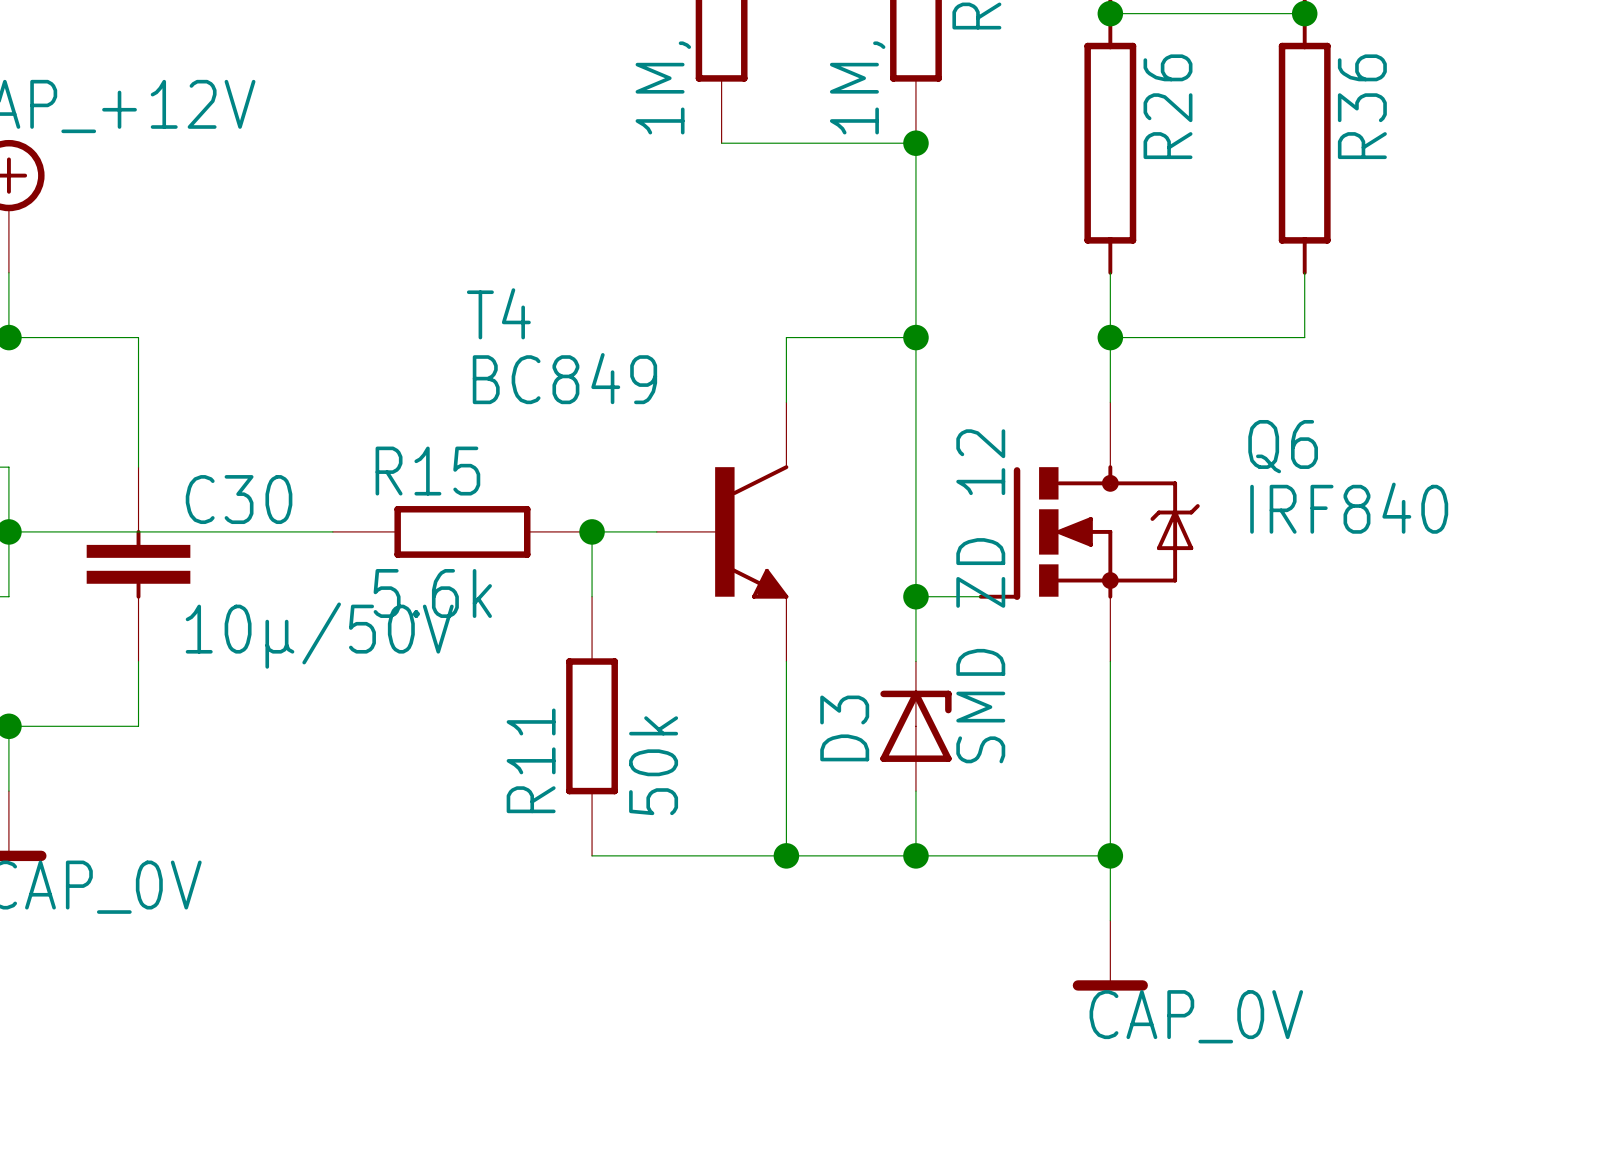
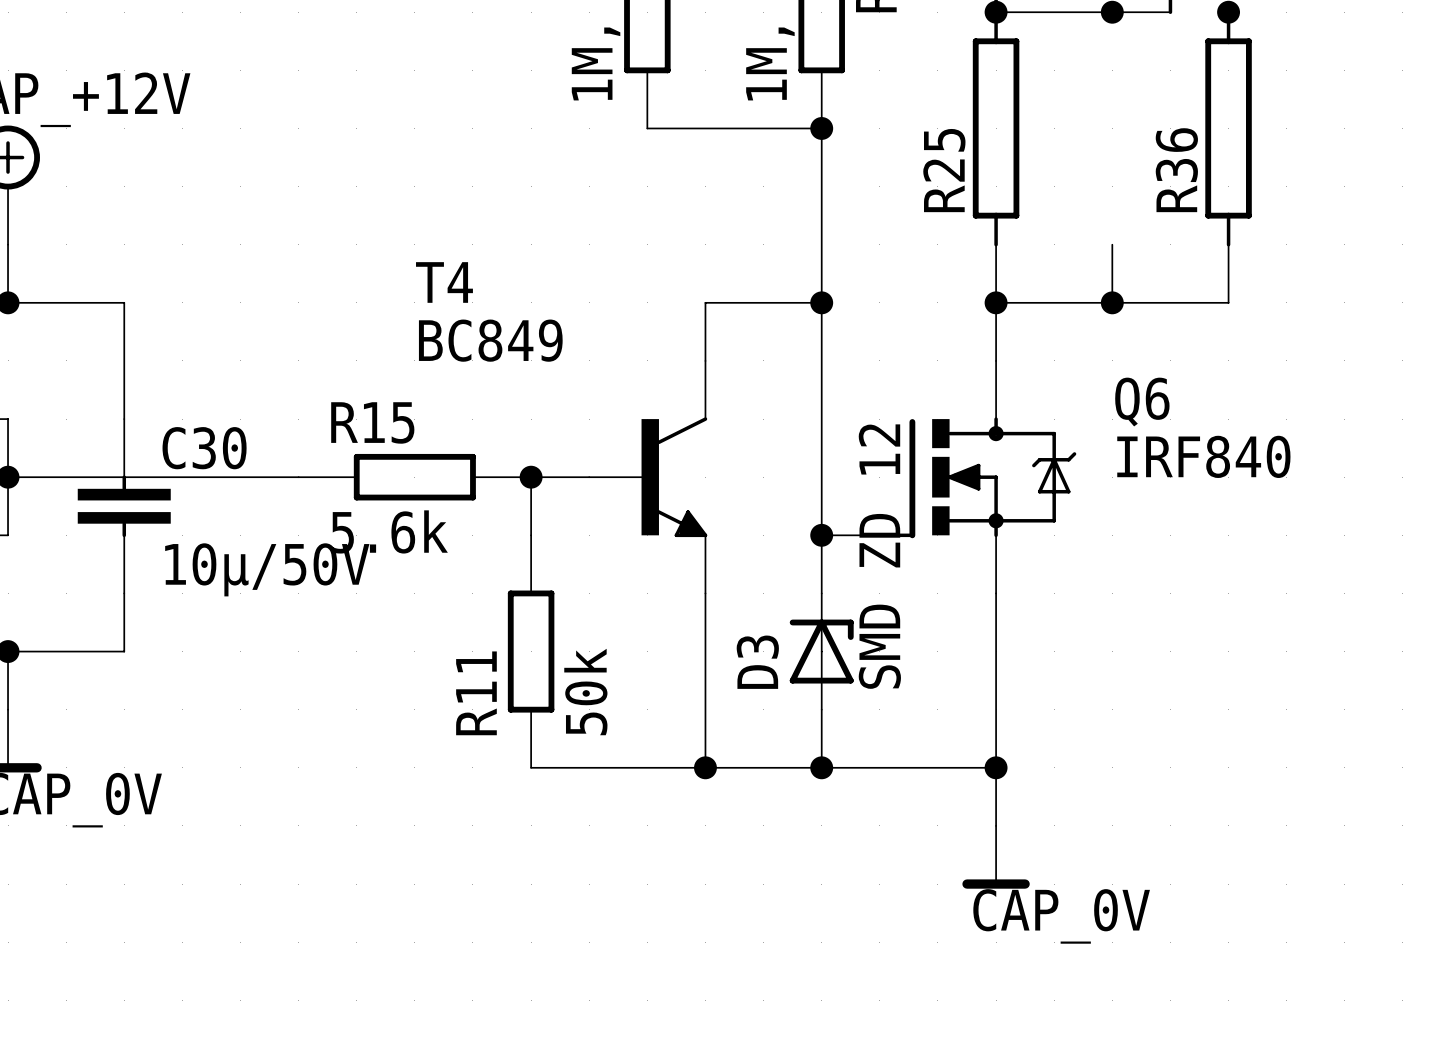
junction: none -> (1112, 12)
junction: (1304, 13) -> none
junction: none -> (1228, 12)
R26 name: R26 (1168, 106) -> R25 (944, 170)
R36 name position: R36 (1362, 106) -> R36 (1176, 170)
R36 position: (1304, 143) -> (1228, 128)
wire: none -> (1112, 244) (1112, 302)
wire: (1304, 272) (1304, 337) -> (1228, 244) (1228, 302) (1170, 302)
junction: none -> (1112, 302)

